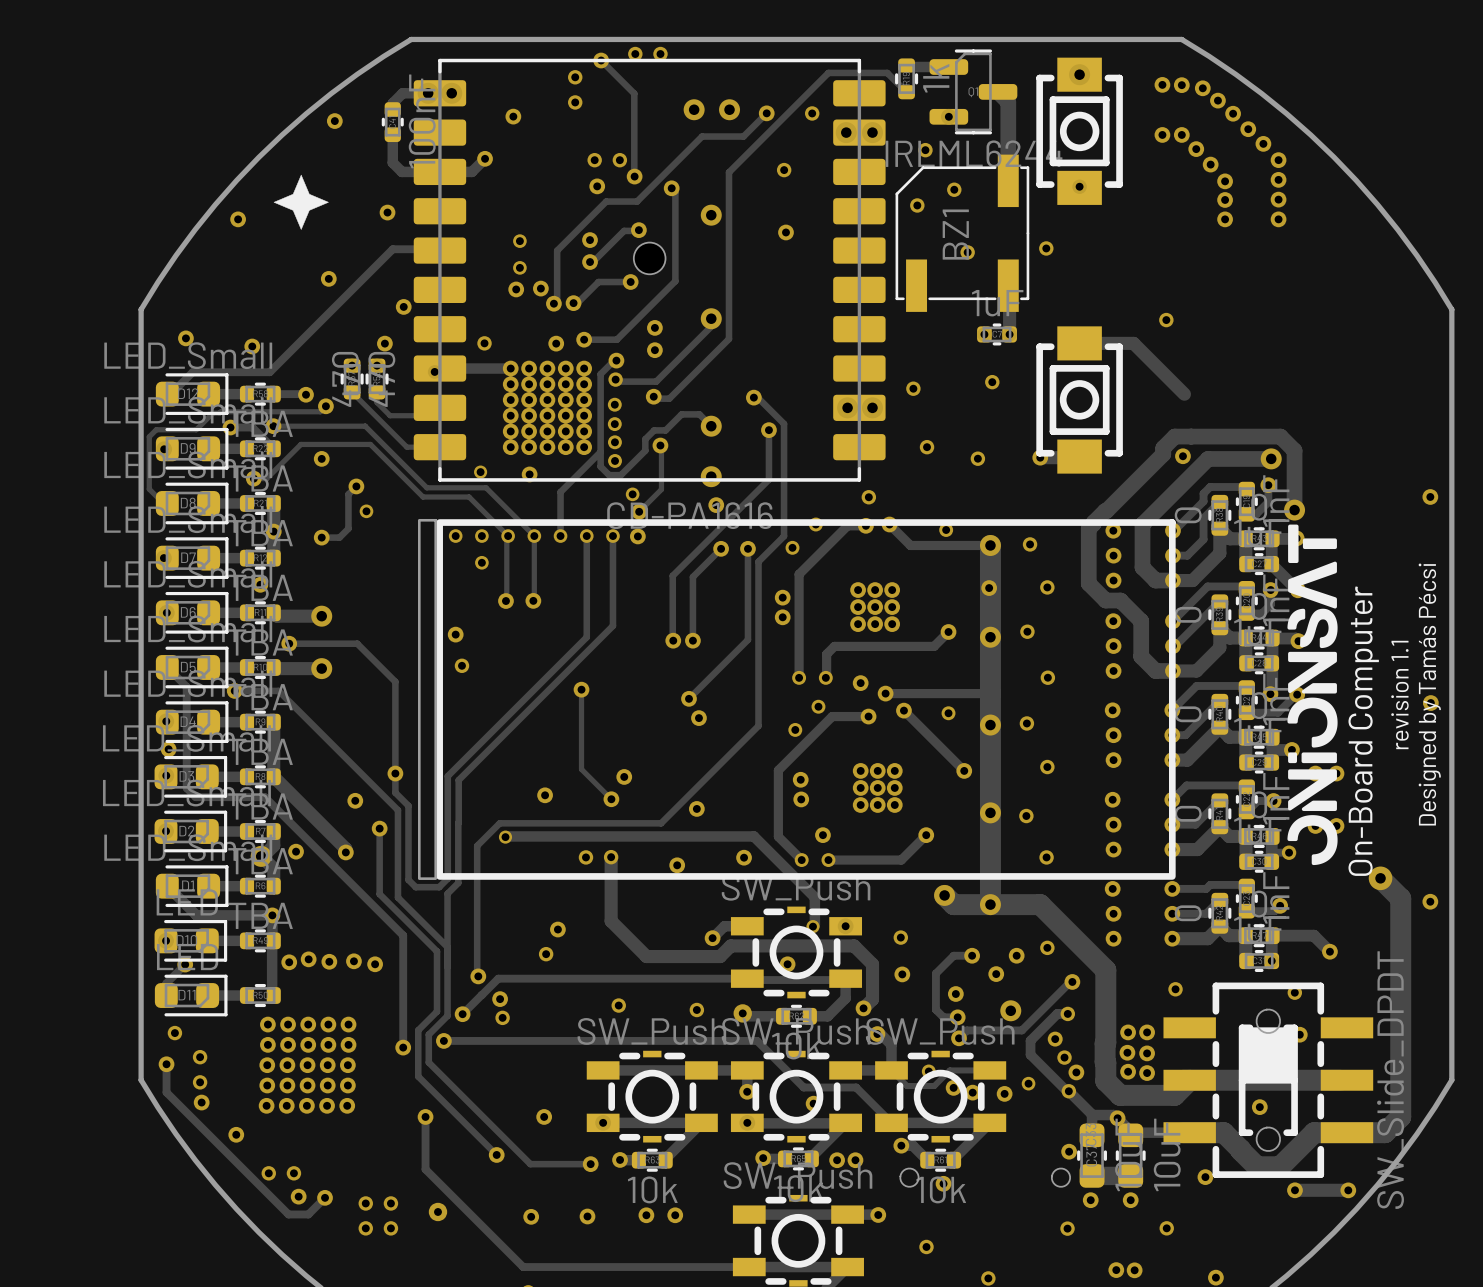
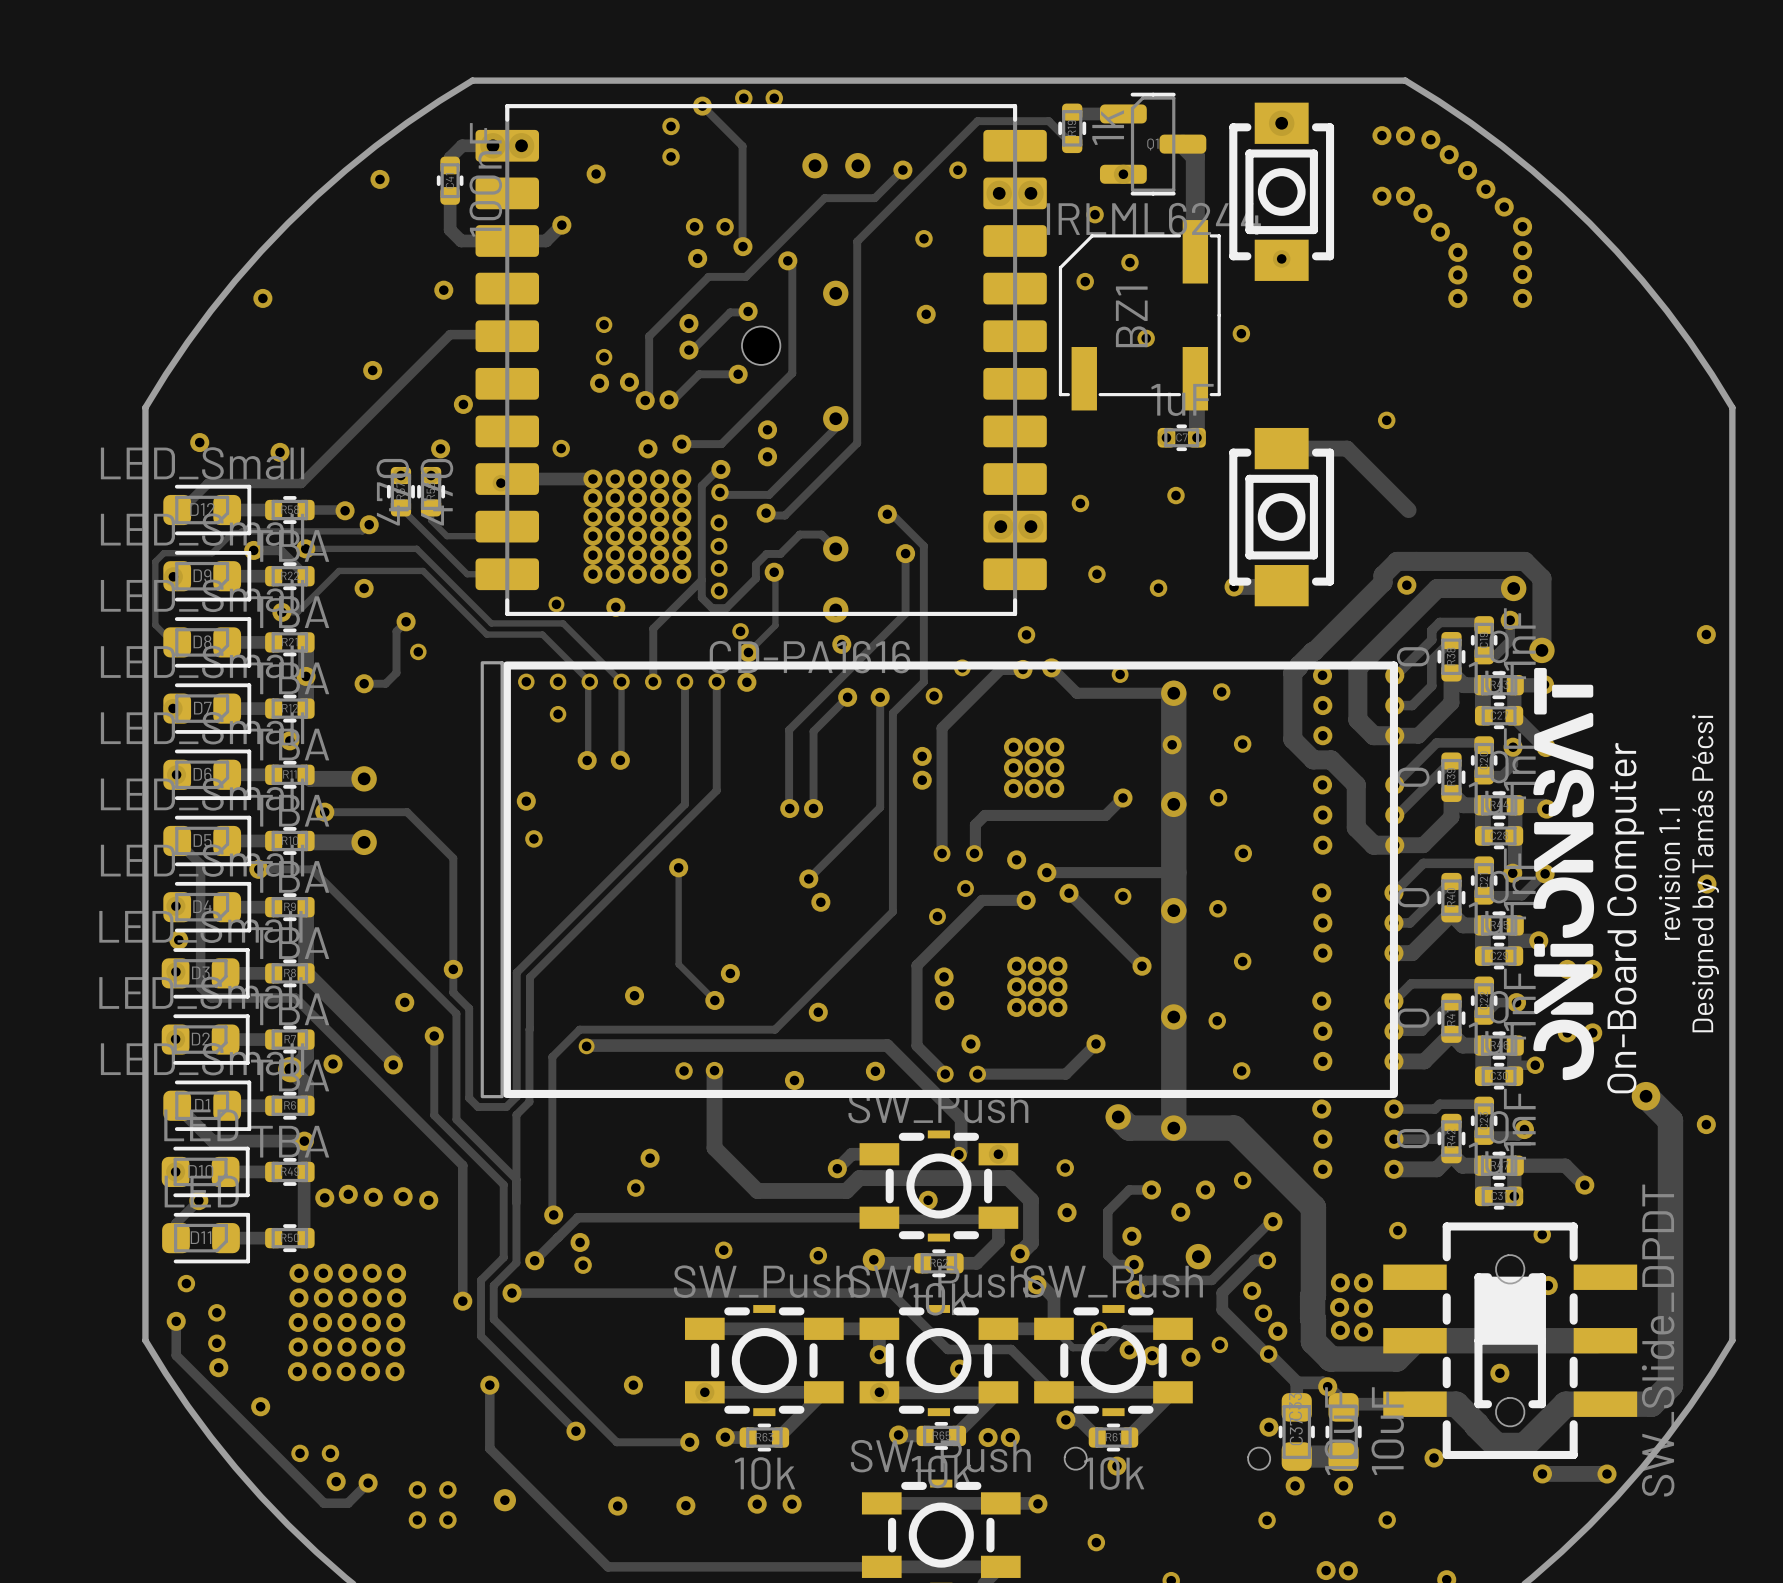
drawing: [273, 174, 329, 230] -> none

